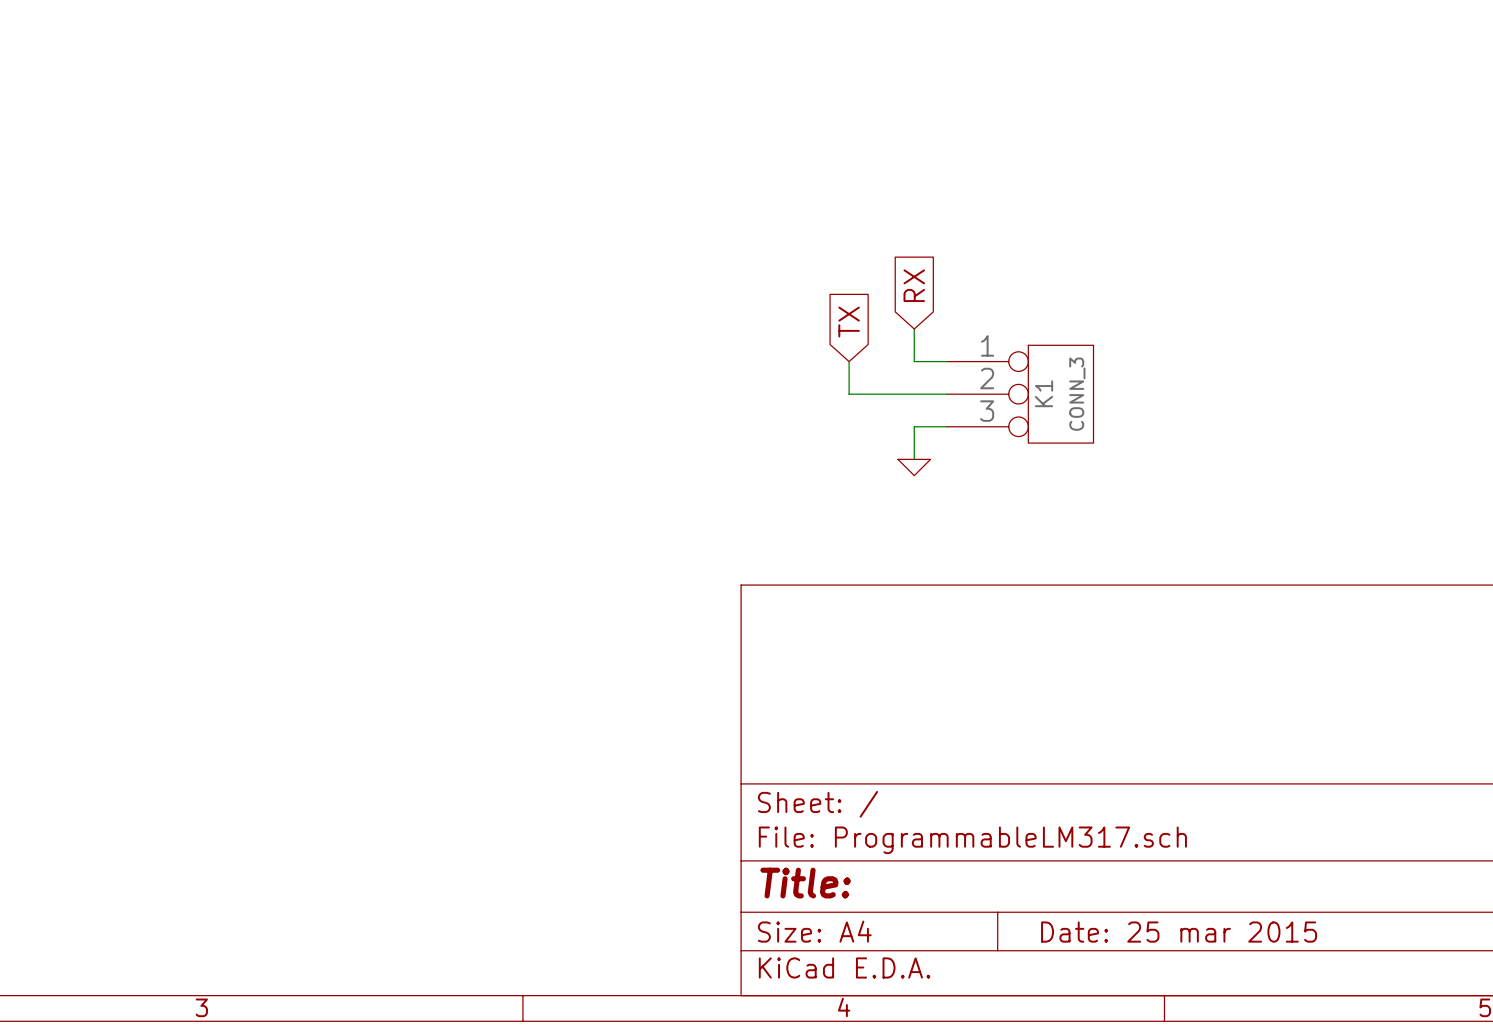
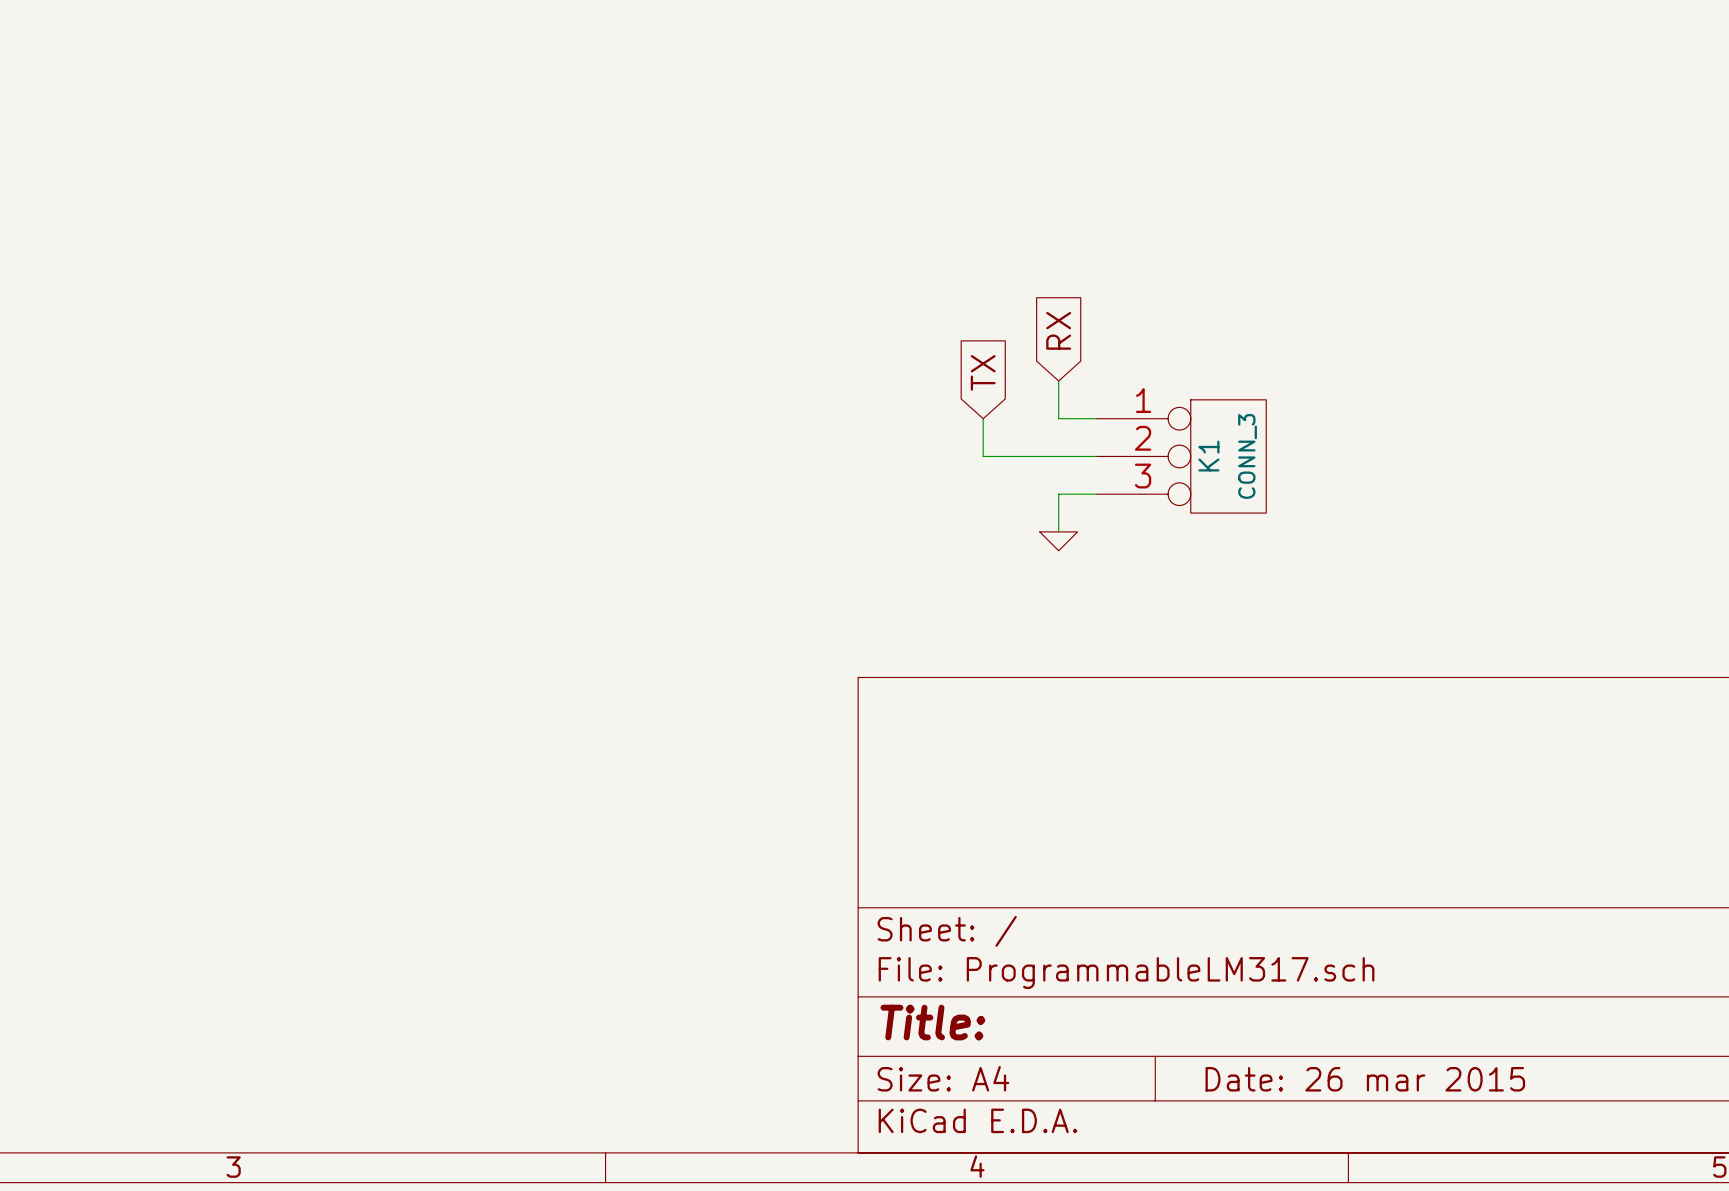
title block: Date: 25 mar 2015 (1179, 932) -> Date: 26 mar 2015 (1365, 1079)

